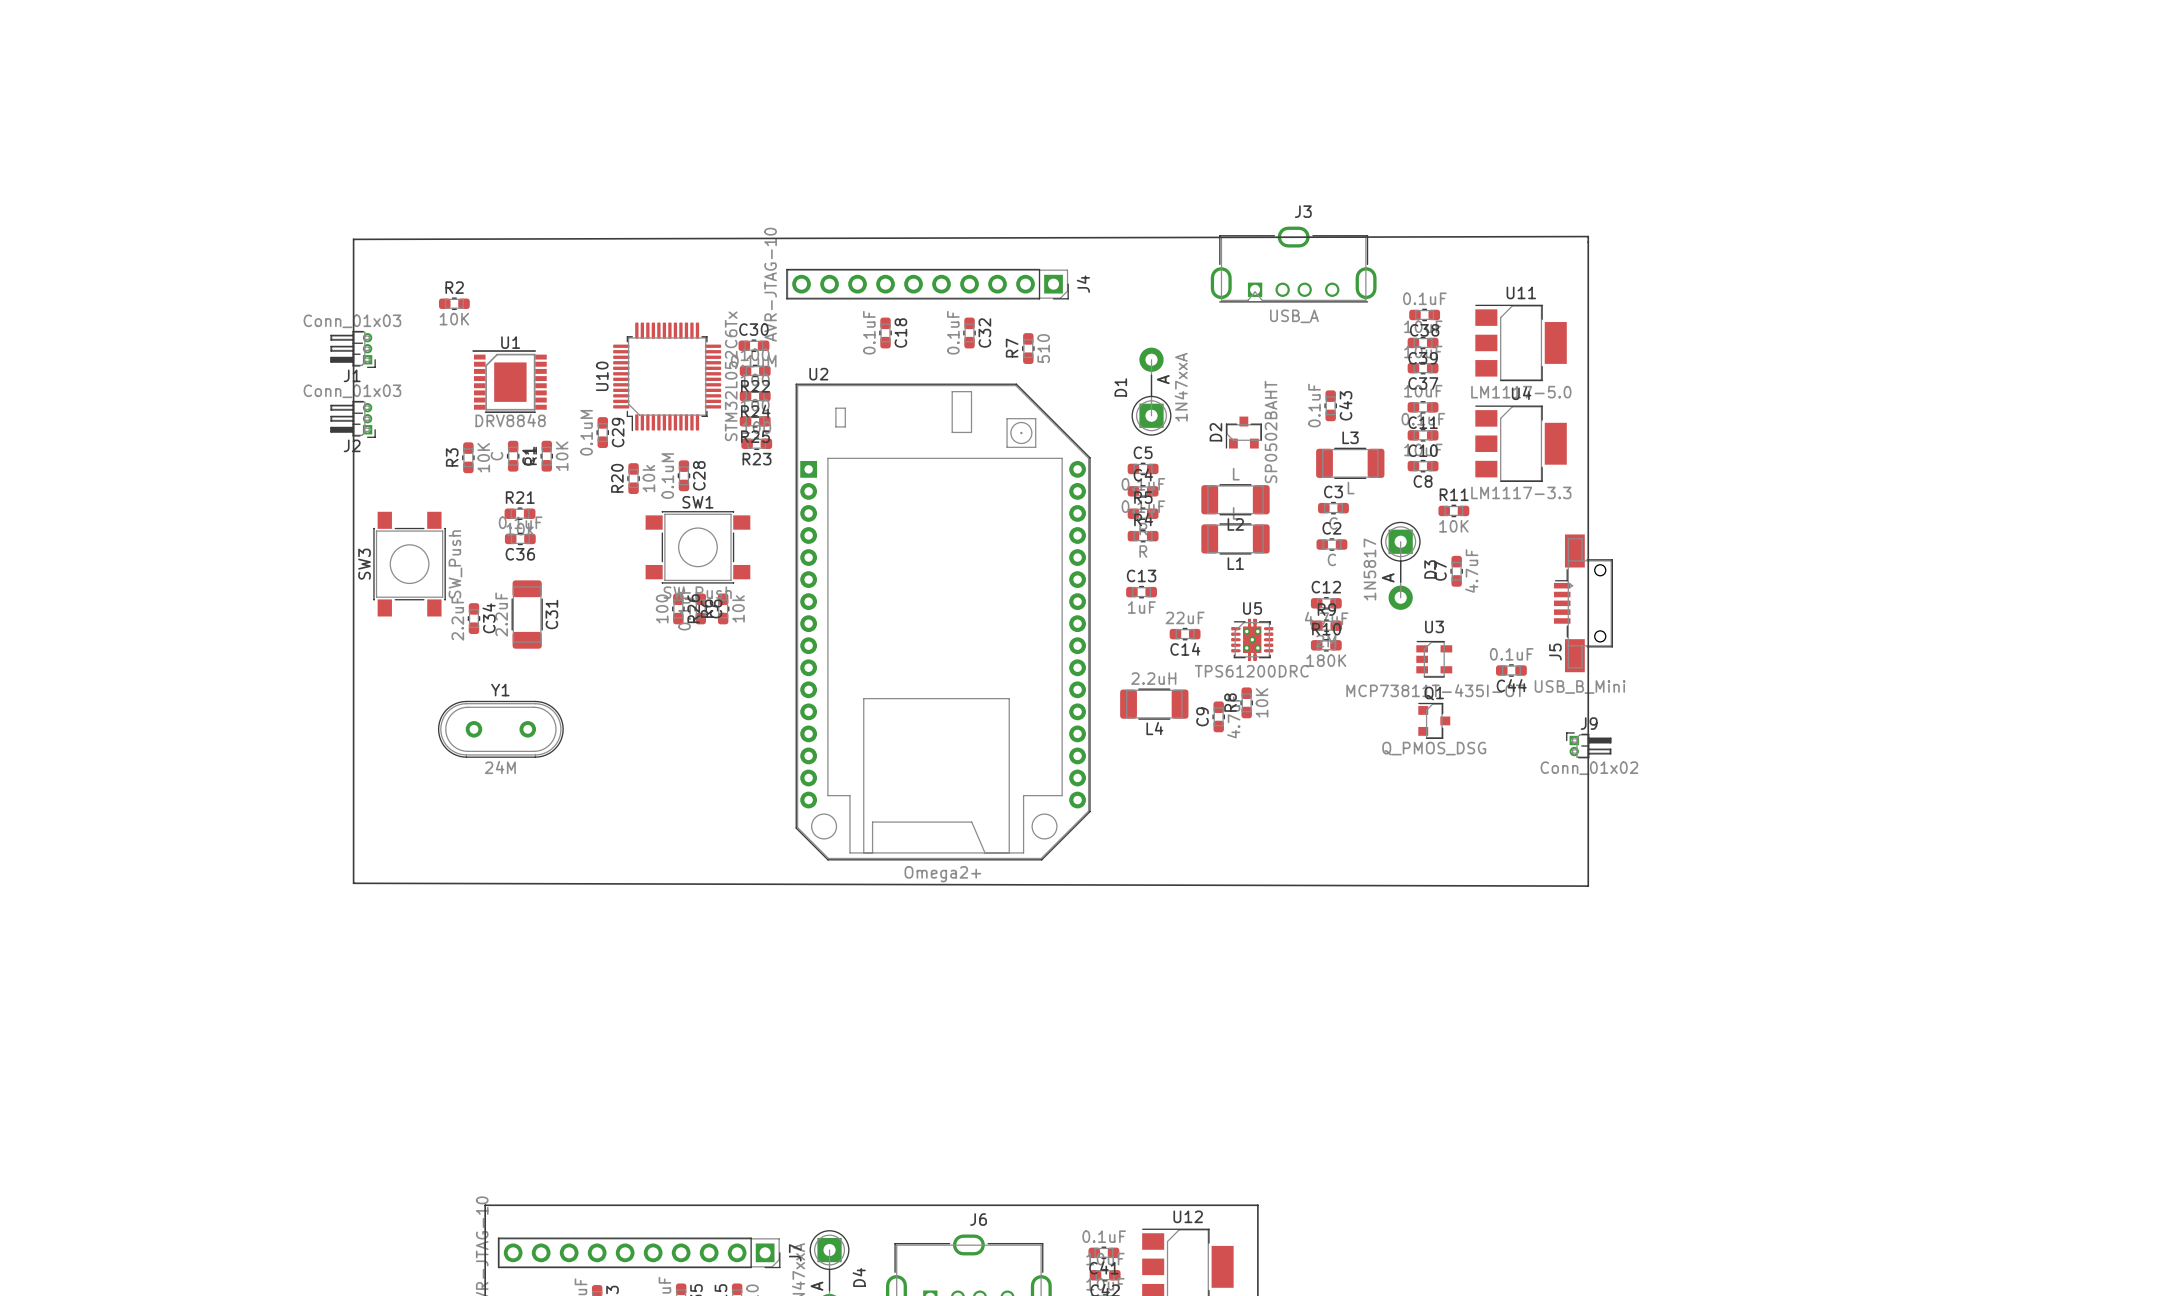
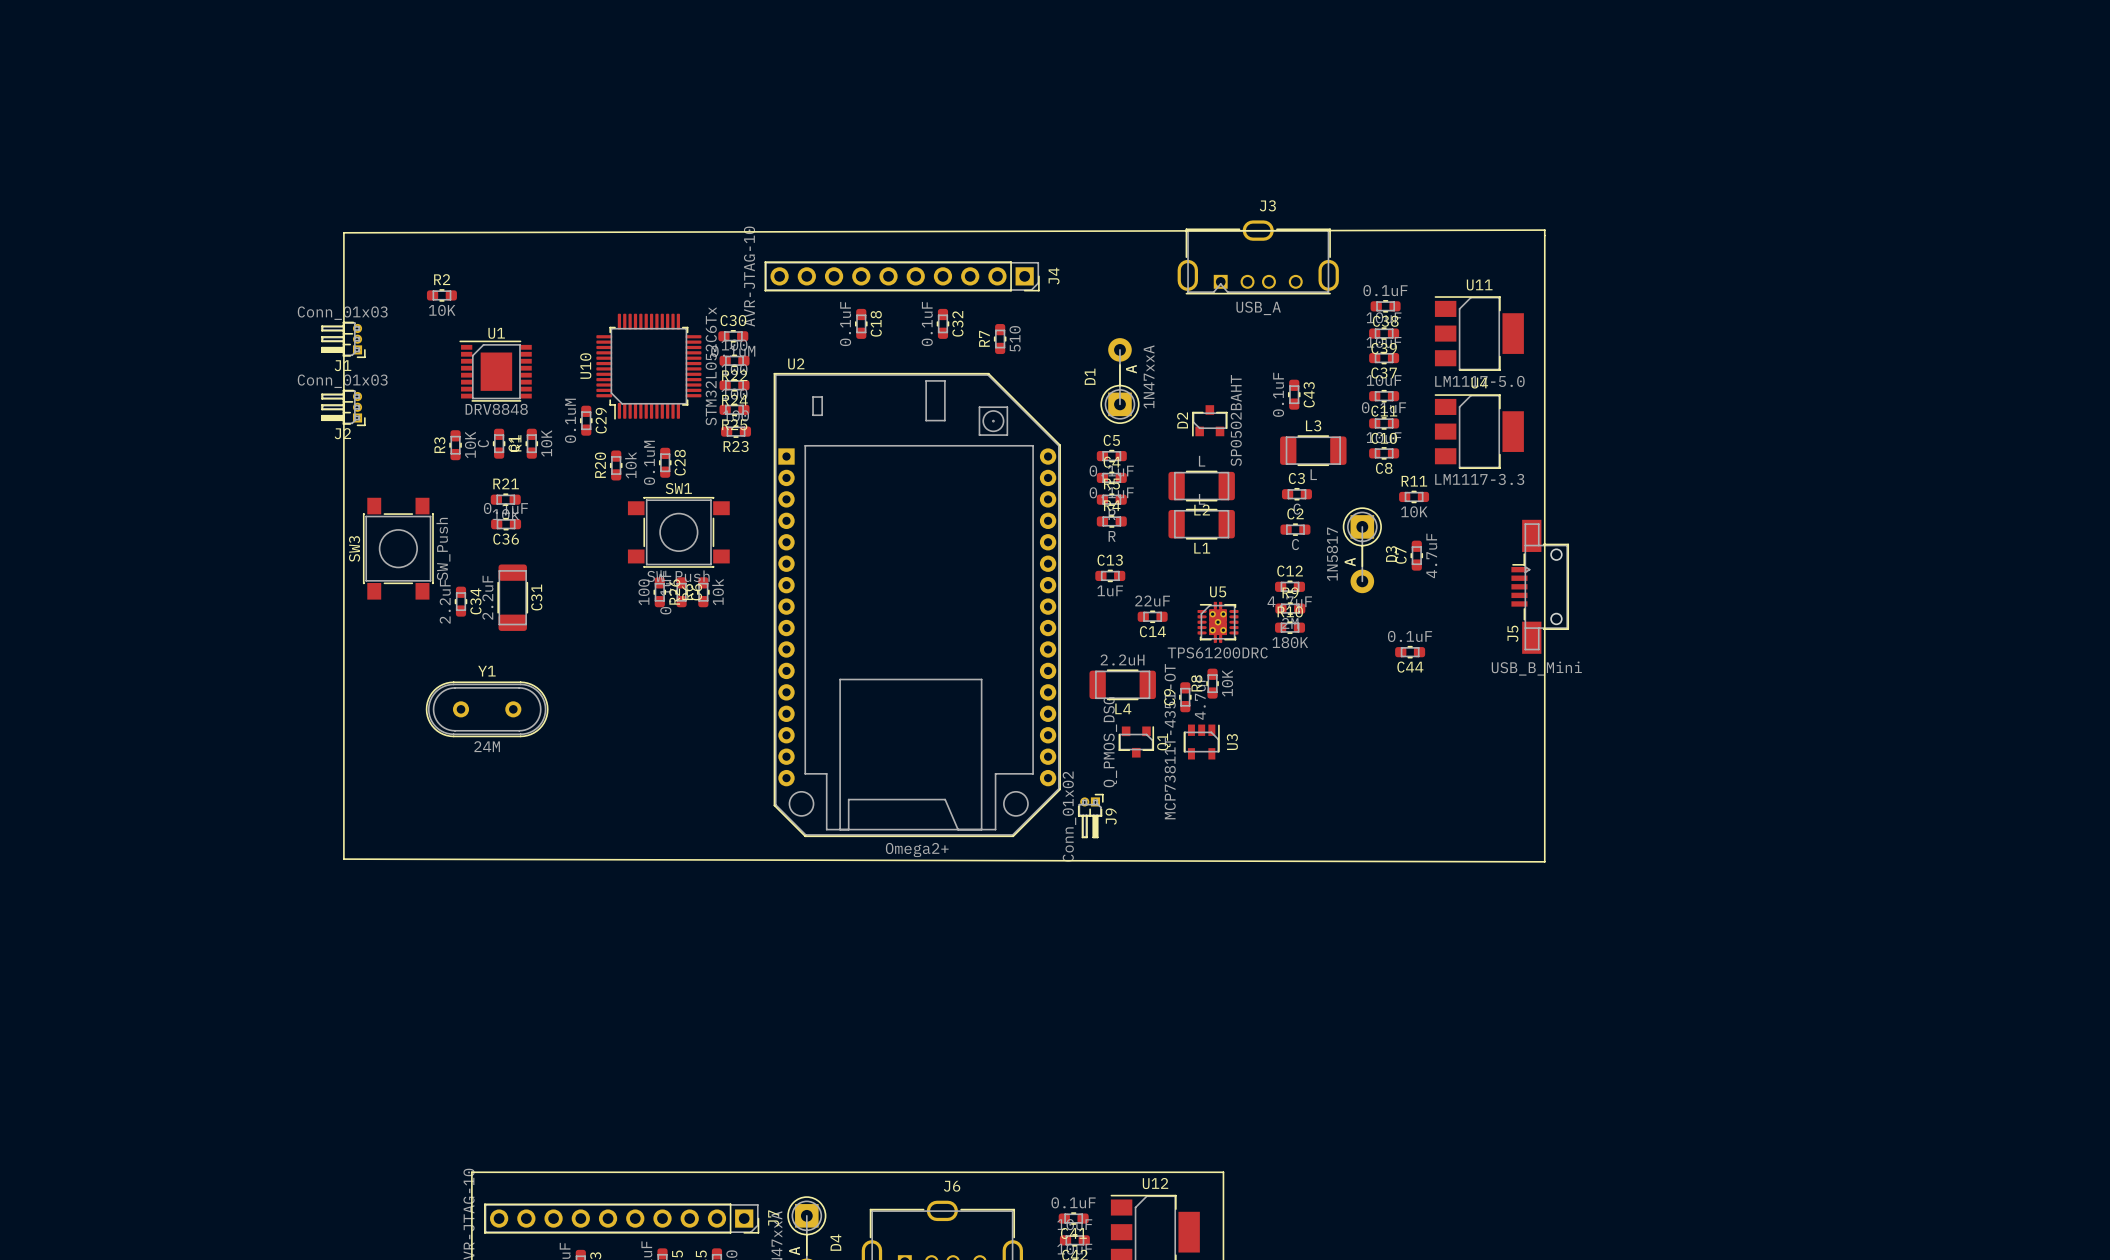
U3 rotation: 0° (1434, 659) -> 90° clockwise (1201, 742)
U3 position: (1434, 659) -> (1201, 742)
C44 position: (1511, 670) -> (1410, 652)
Q1 rotation: 0° (1434, 720) -> 90° clockwise (1136, 741)
Q1 position: (1434, 720) -> (1136, 741)
J9 rotation: 0° (1588, 745) -> 90° clockwise (1090, 816)
J9 position: (1588, 745) -> (1090, 816)

